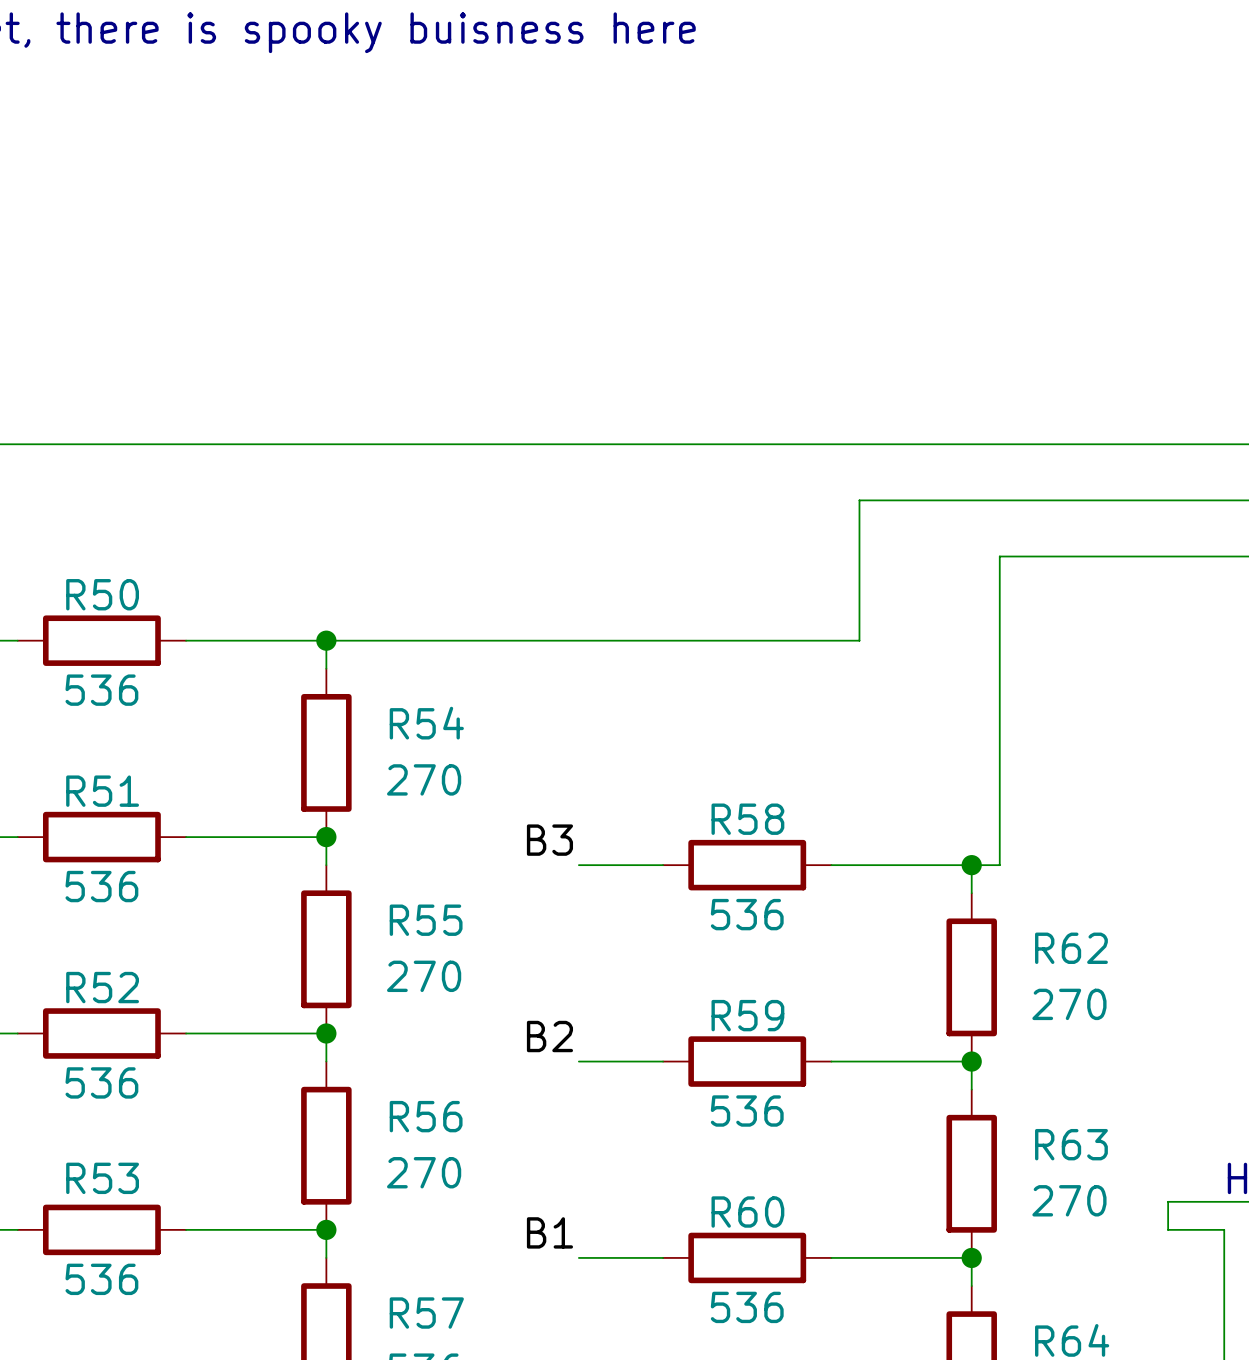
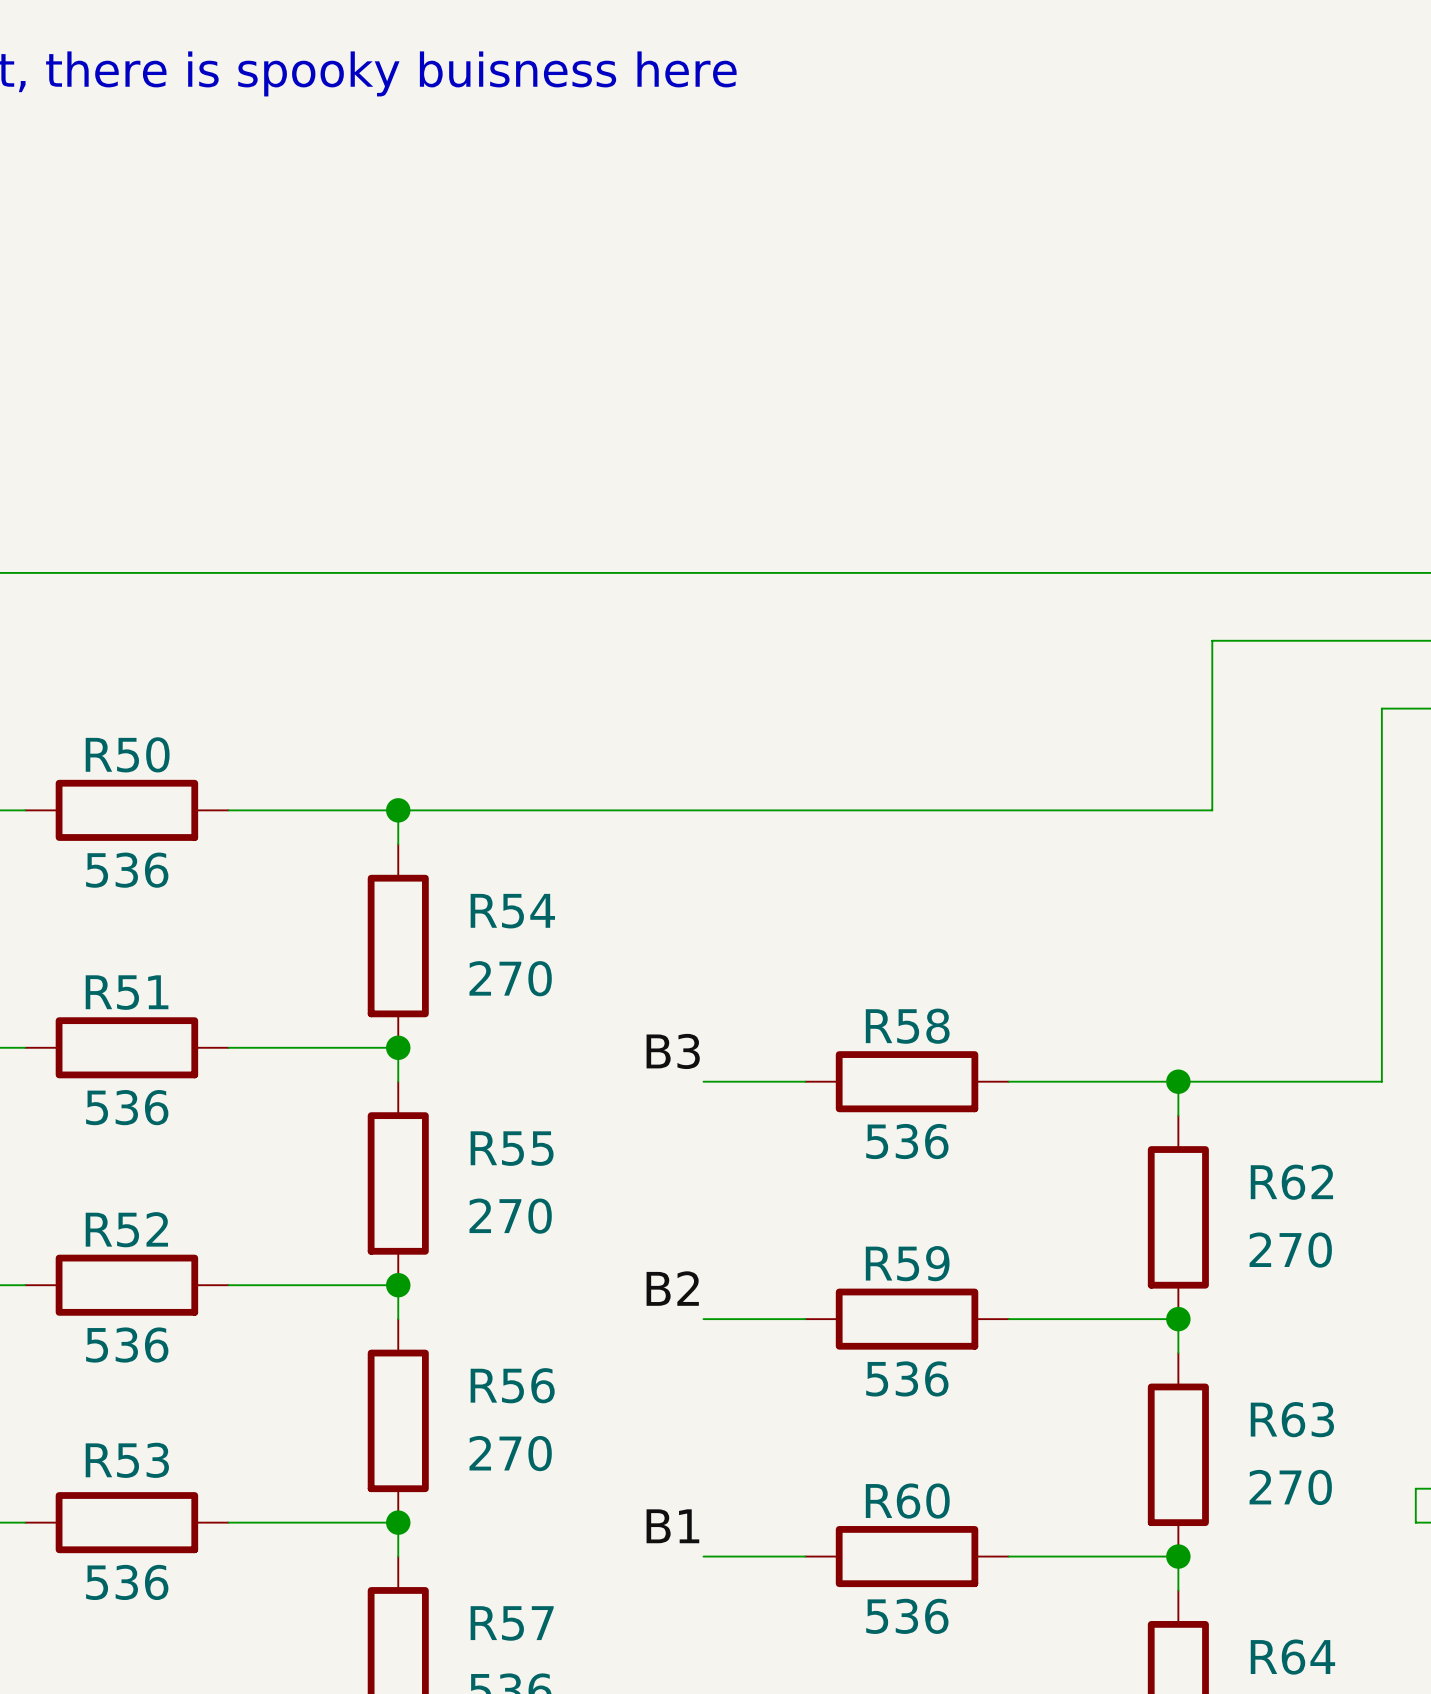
wire: (999, 500) (859, 500) (859, 640) -> (1212, 810) (1042, 810)
wire: (999, 556) (1140, 556) -> (1212, 708) (1212, 640)
wire: (999, 640) (999, 865) -> (1381, 708) (1381, 1081) (1212, 1081)

